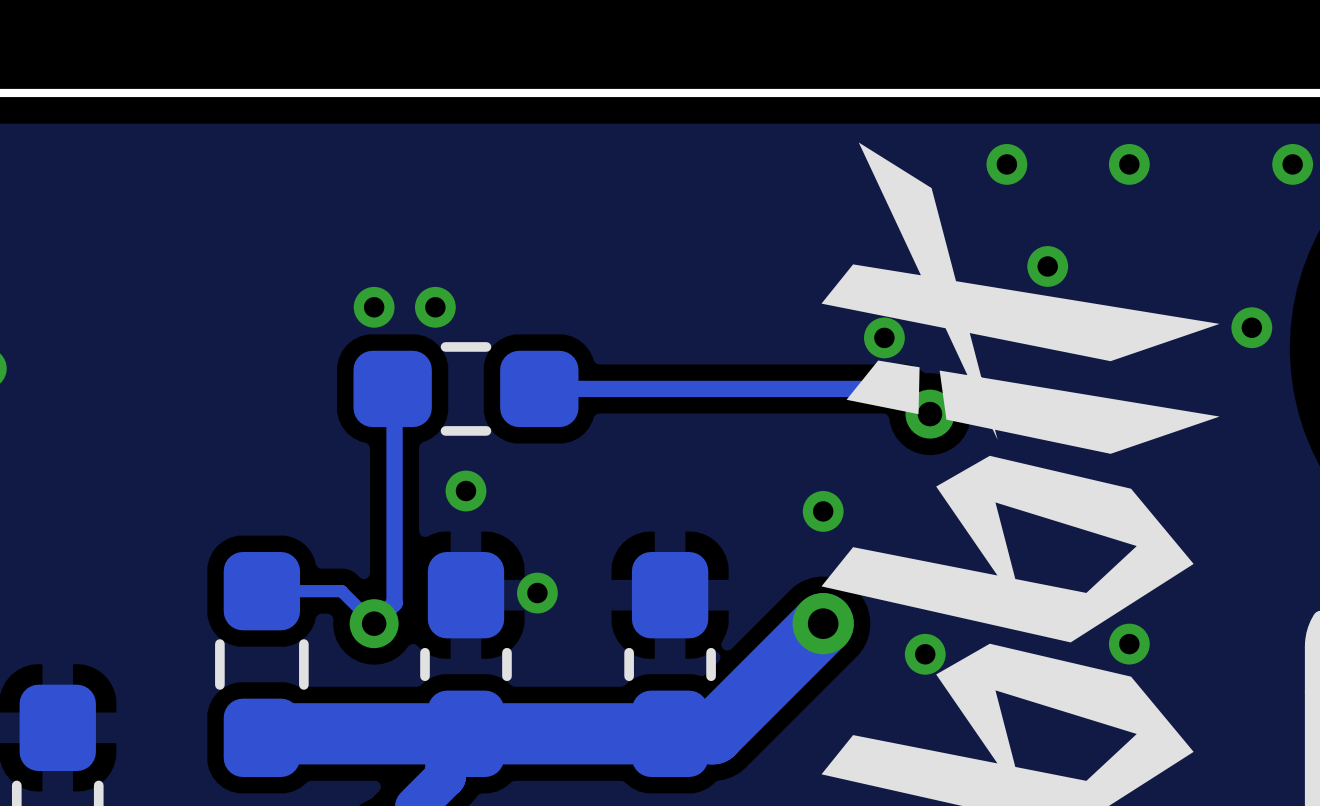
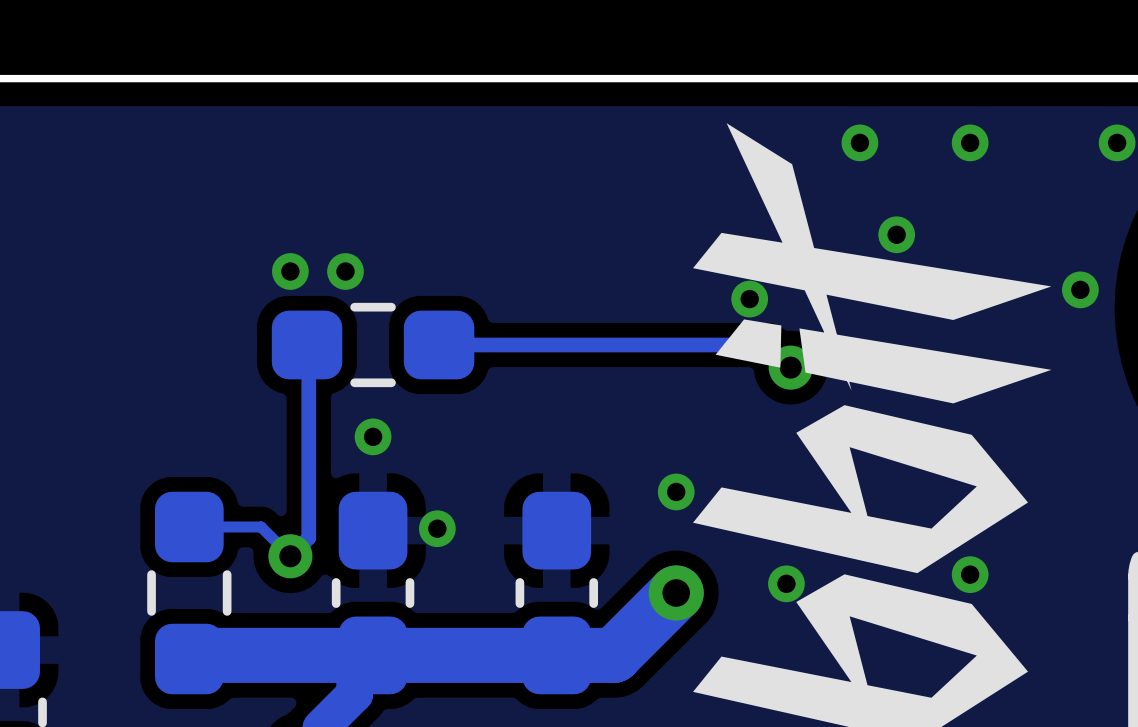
via position: (823, 511) -> (676, 491)
track: (823, 623) (713, 733) -> (676, 593) (613, 655) (595, 655)
via position: (823, 623) -> (676, 593)

